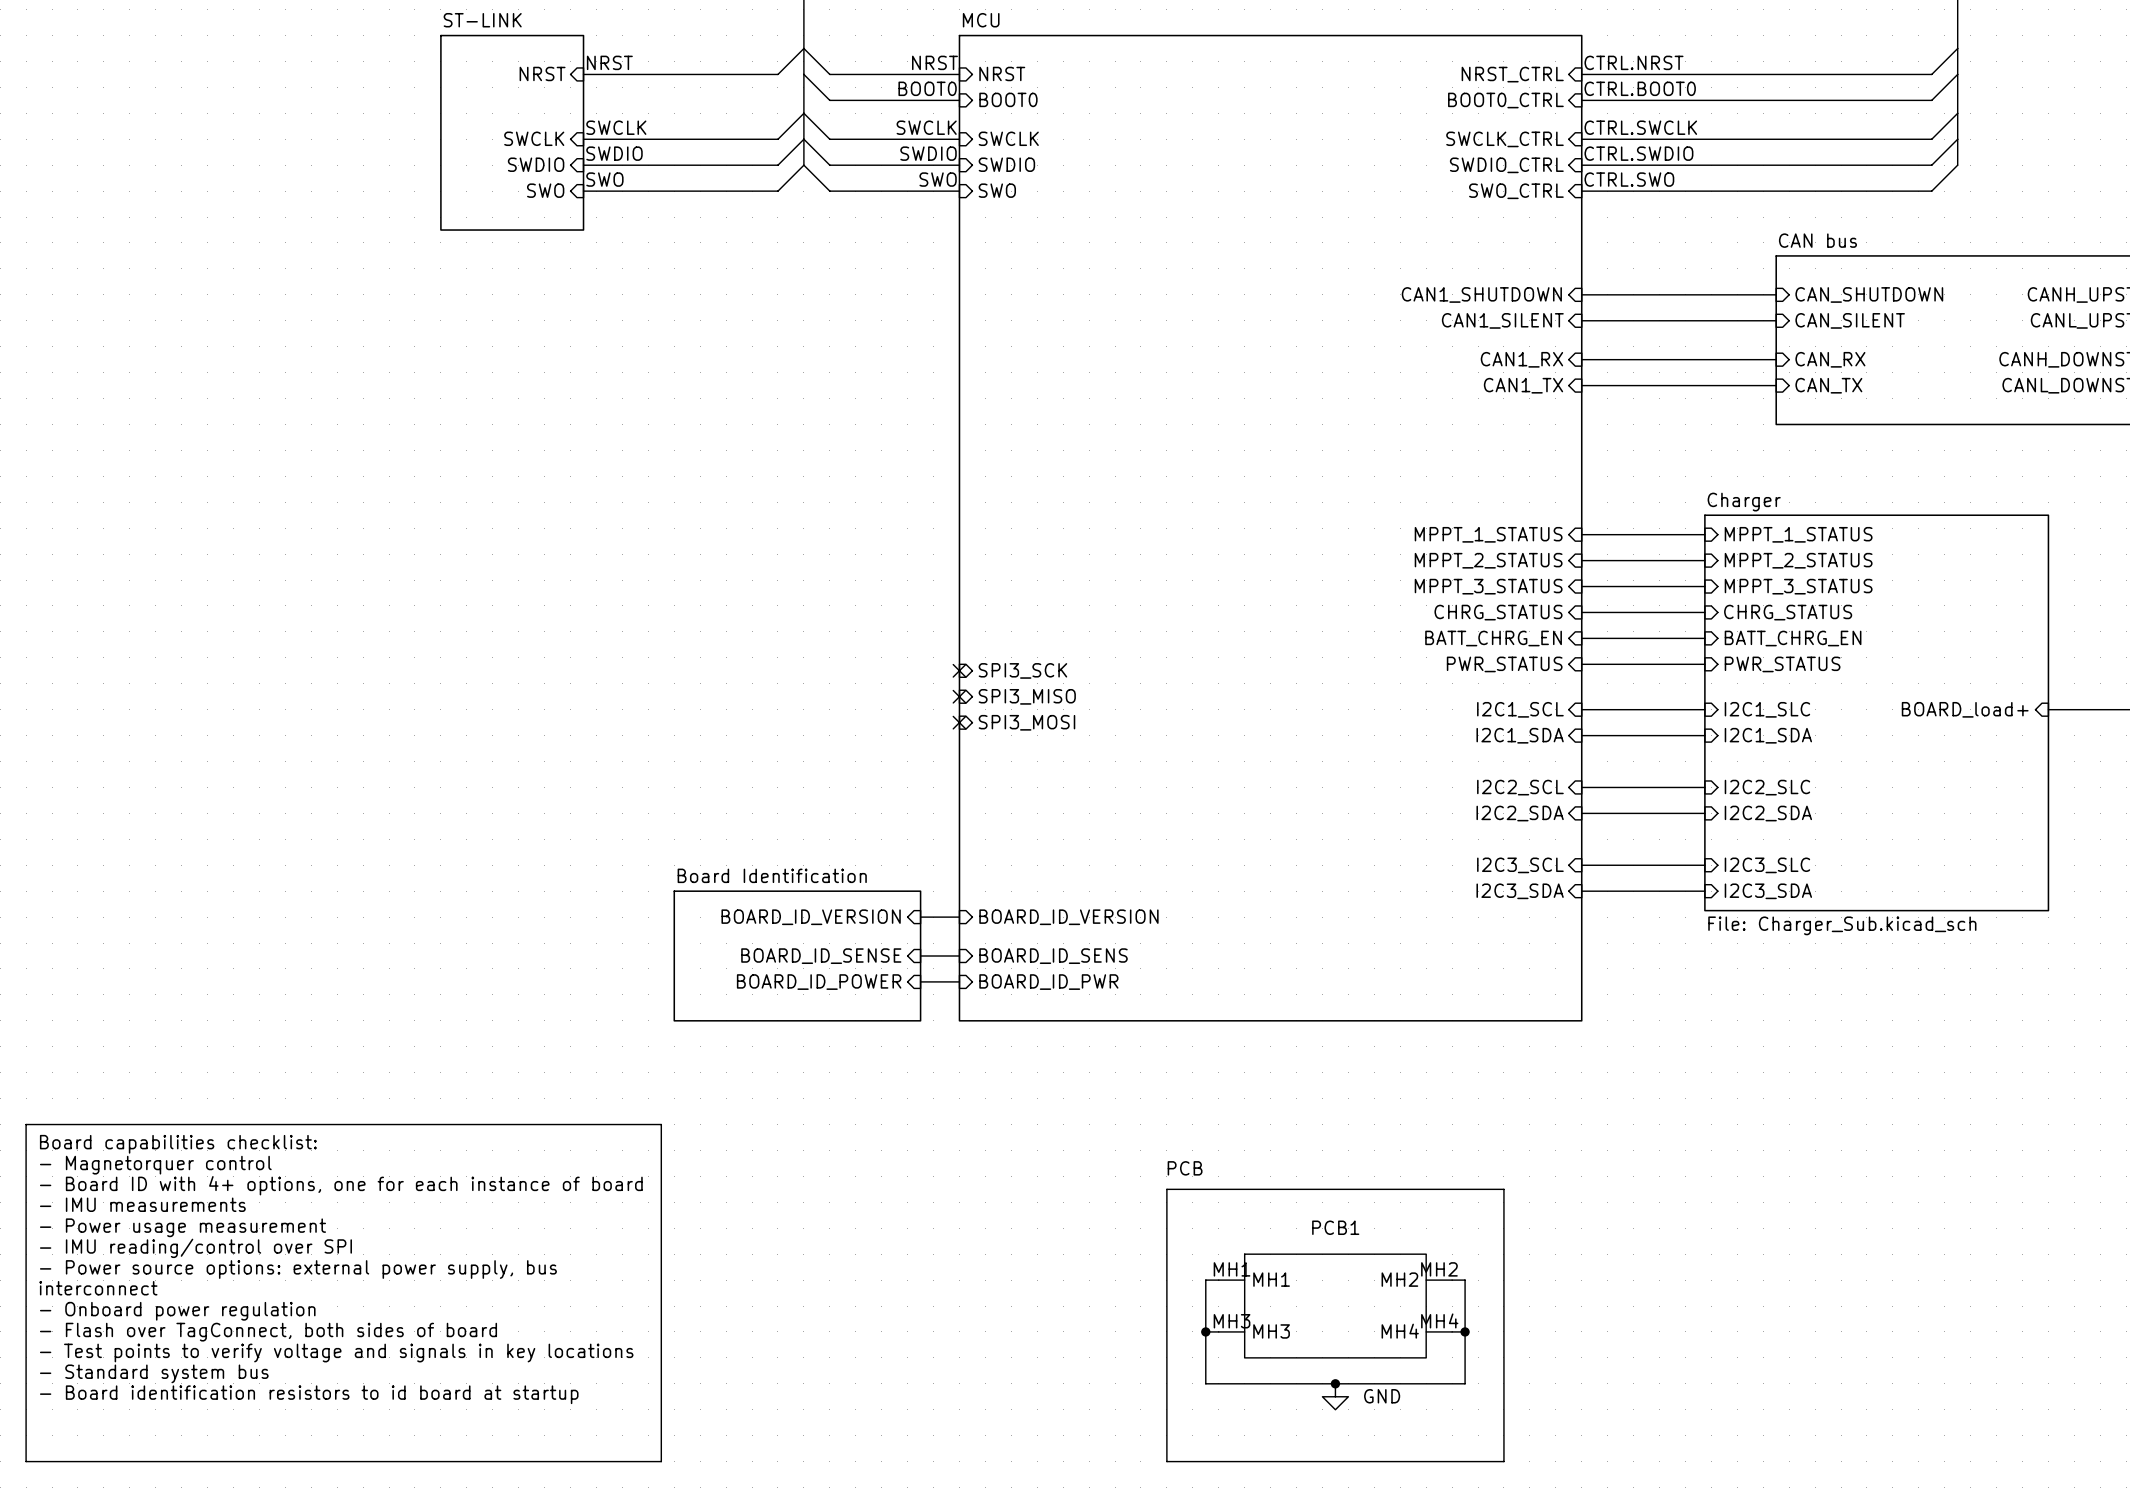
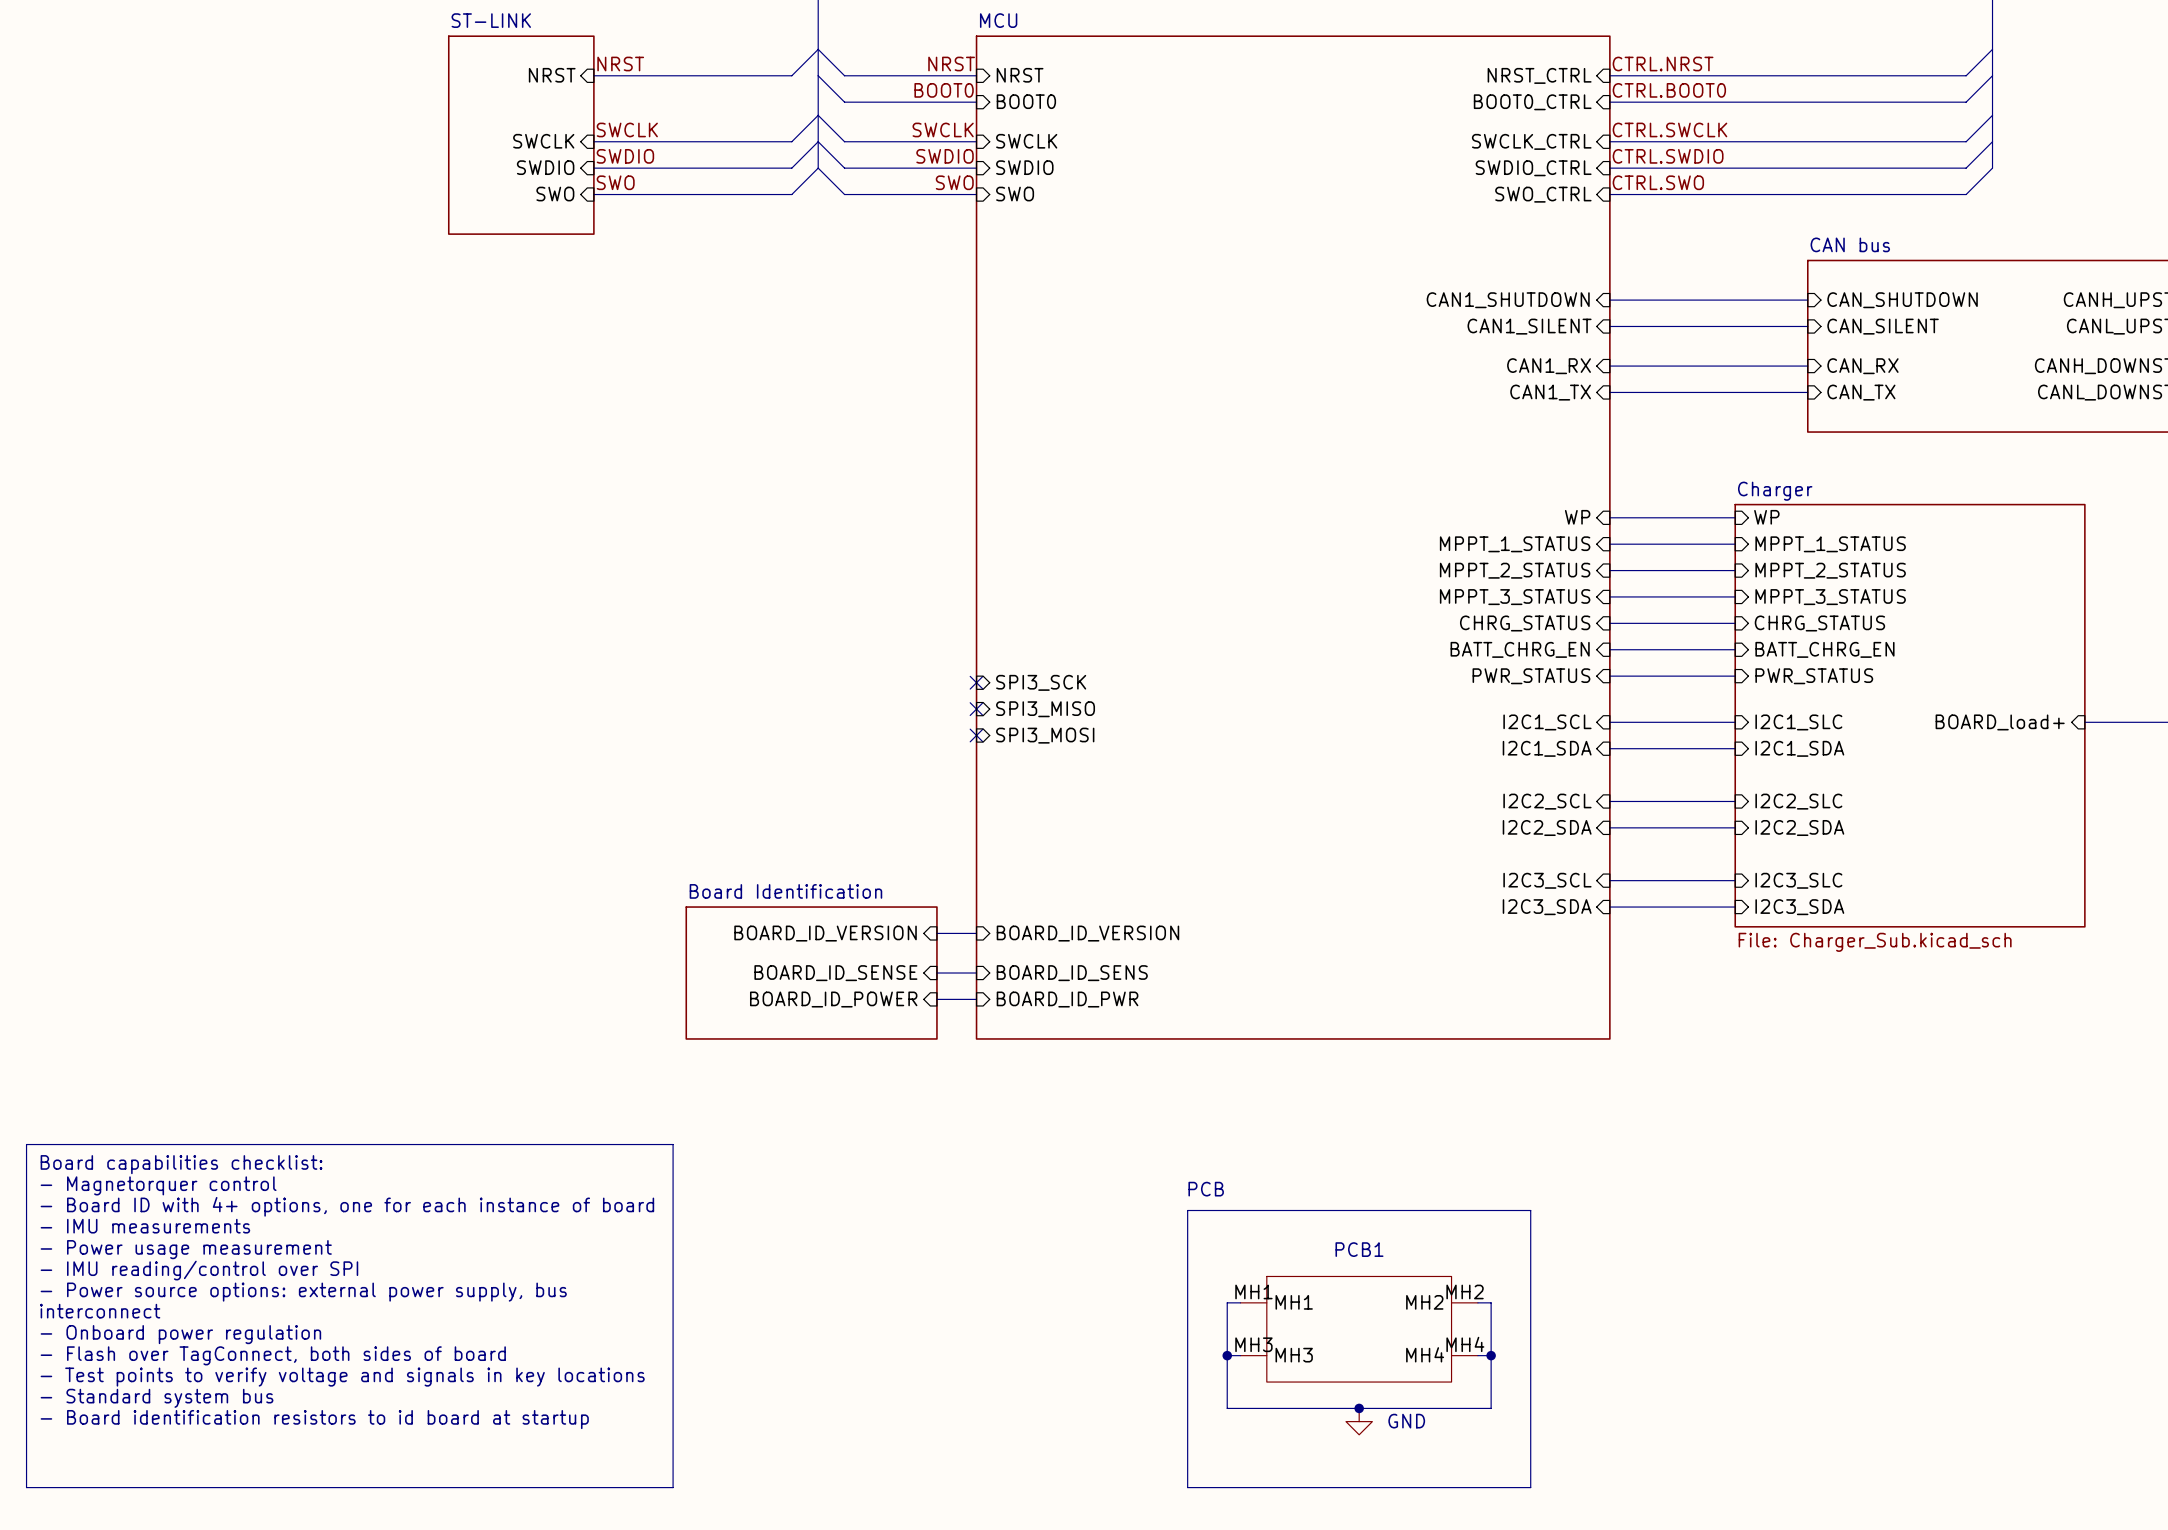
sheet pin: none -> WP (1577, 517)
wire: none -> (1609, 517) (1735, 517)
sheet pin: none -> WP (1766, 517)
sheet Charger shape: [1704, 514, 2050, 912] -> [1734, 503, 2086, 928]

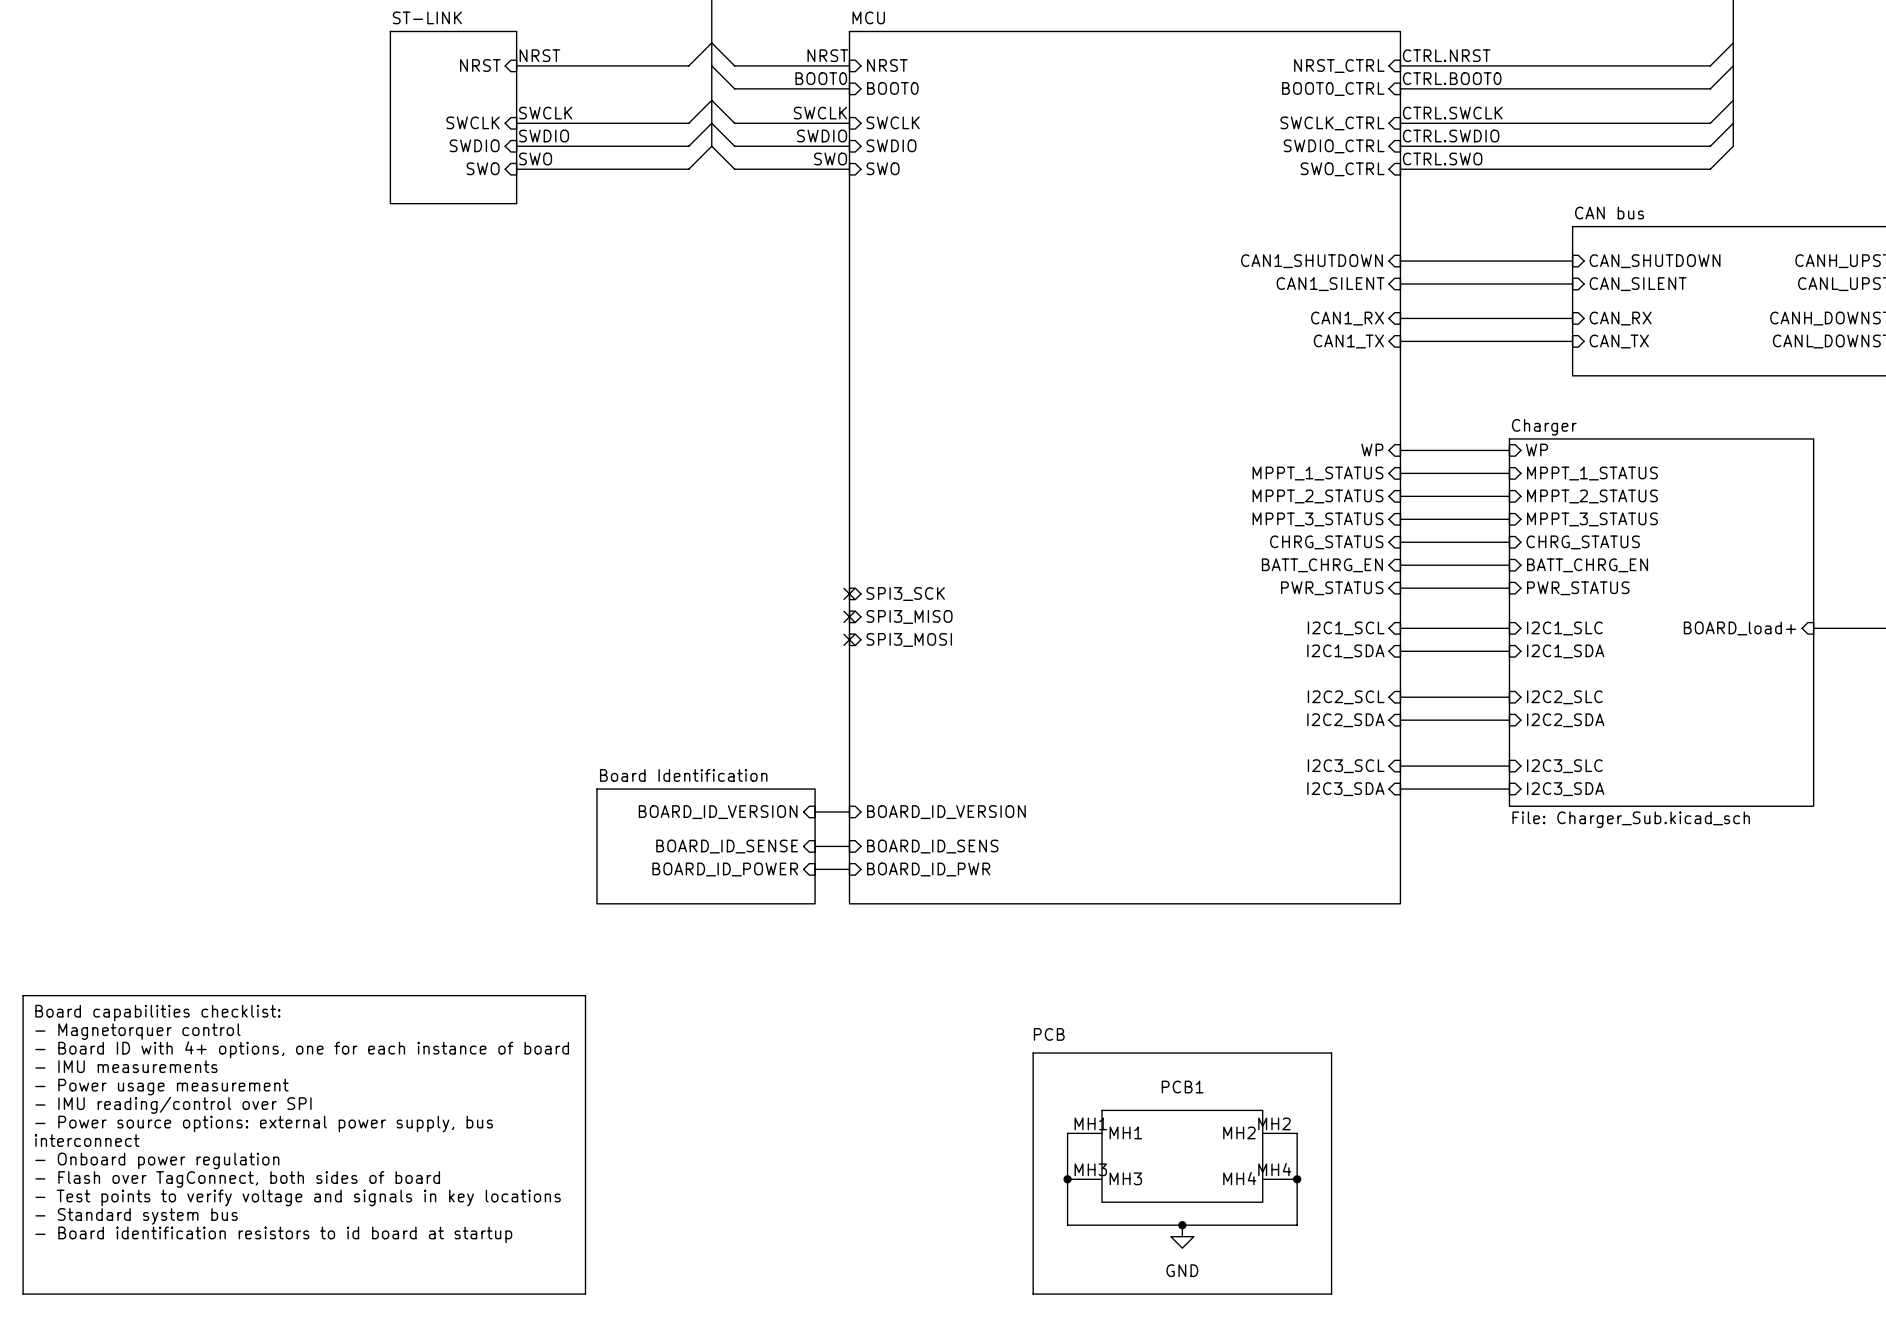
power symbol text position: GND (1406, 1421) -> GND (1182, 1270)

